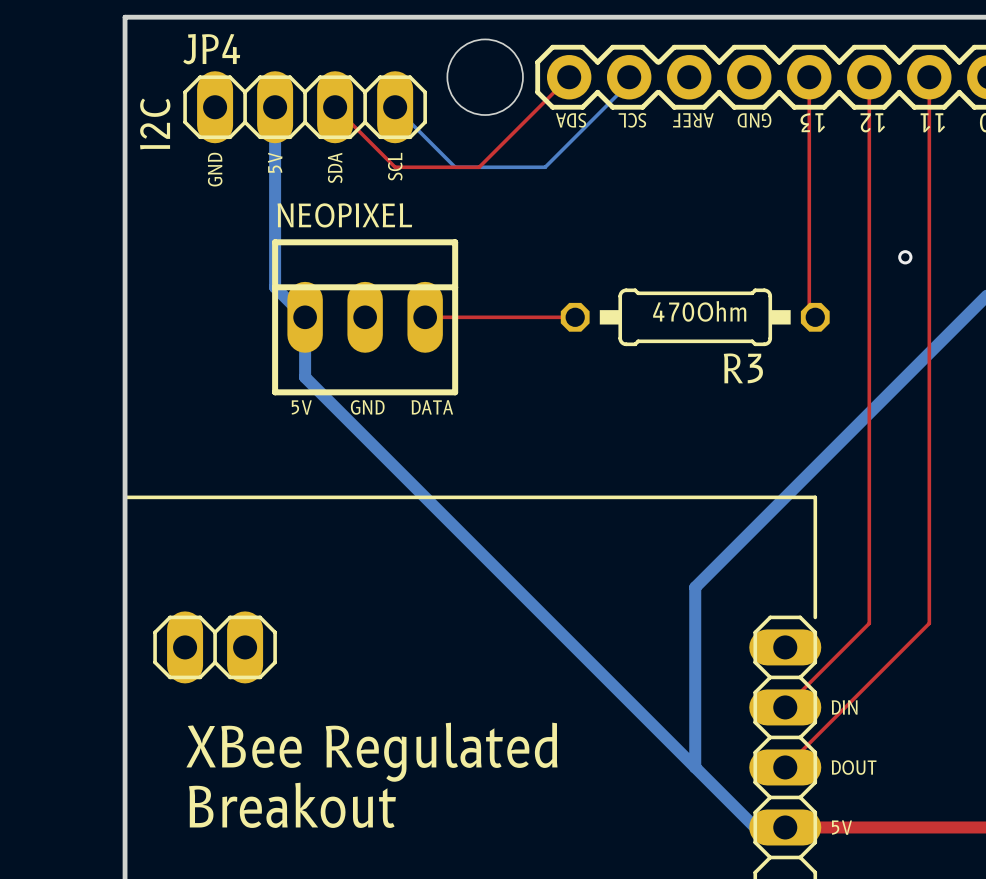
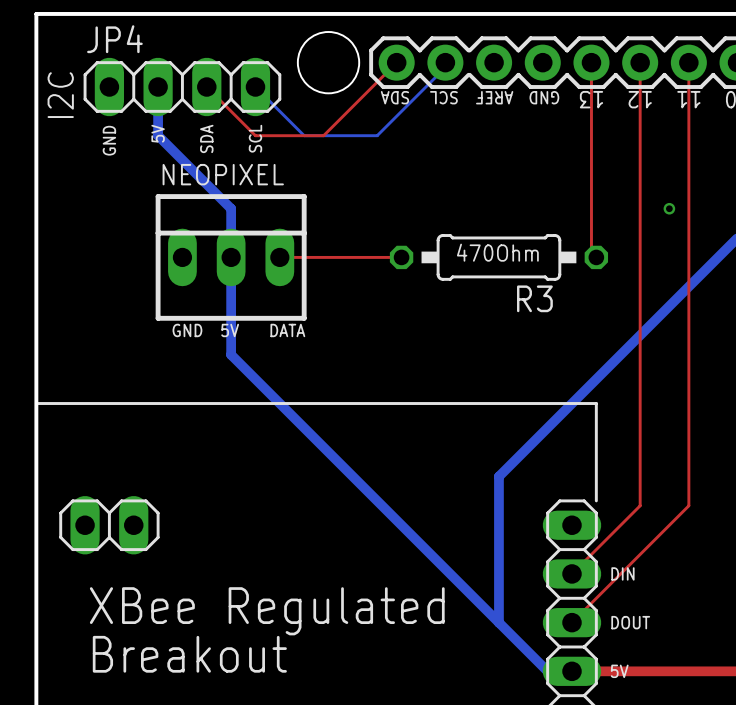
bottom track: (275, 167) (275, 287) (305, 317) (305, 377) (365, 437) -> (158, 135) (231, 208) (231, 354)
text: 5V (301, 407) -> GND (187, 330)
text: GND (367, 407) -> 5V (230, 330)

